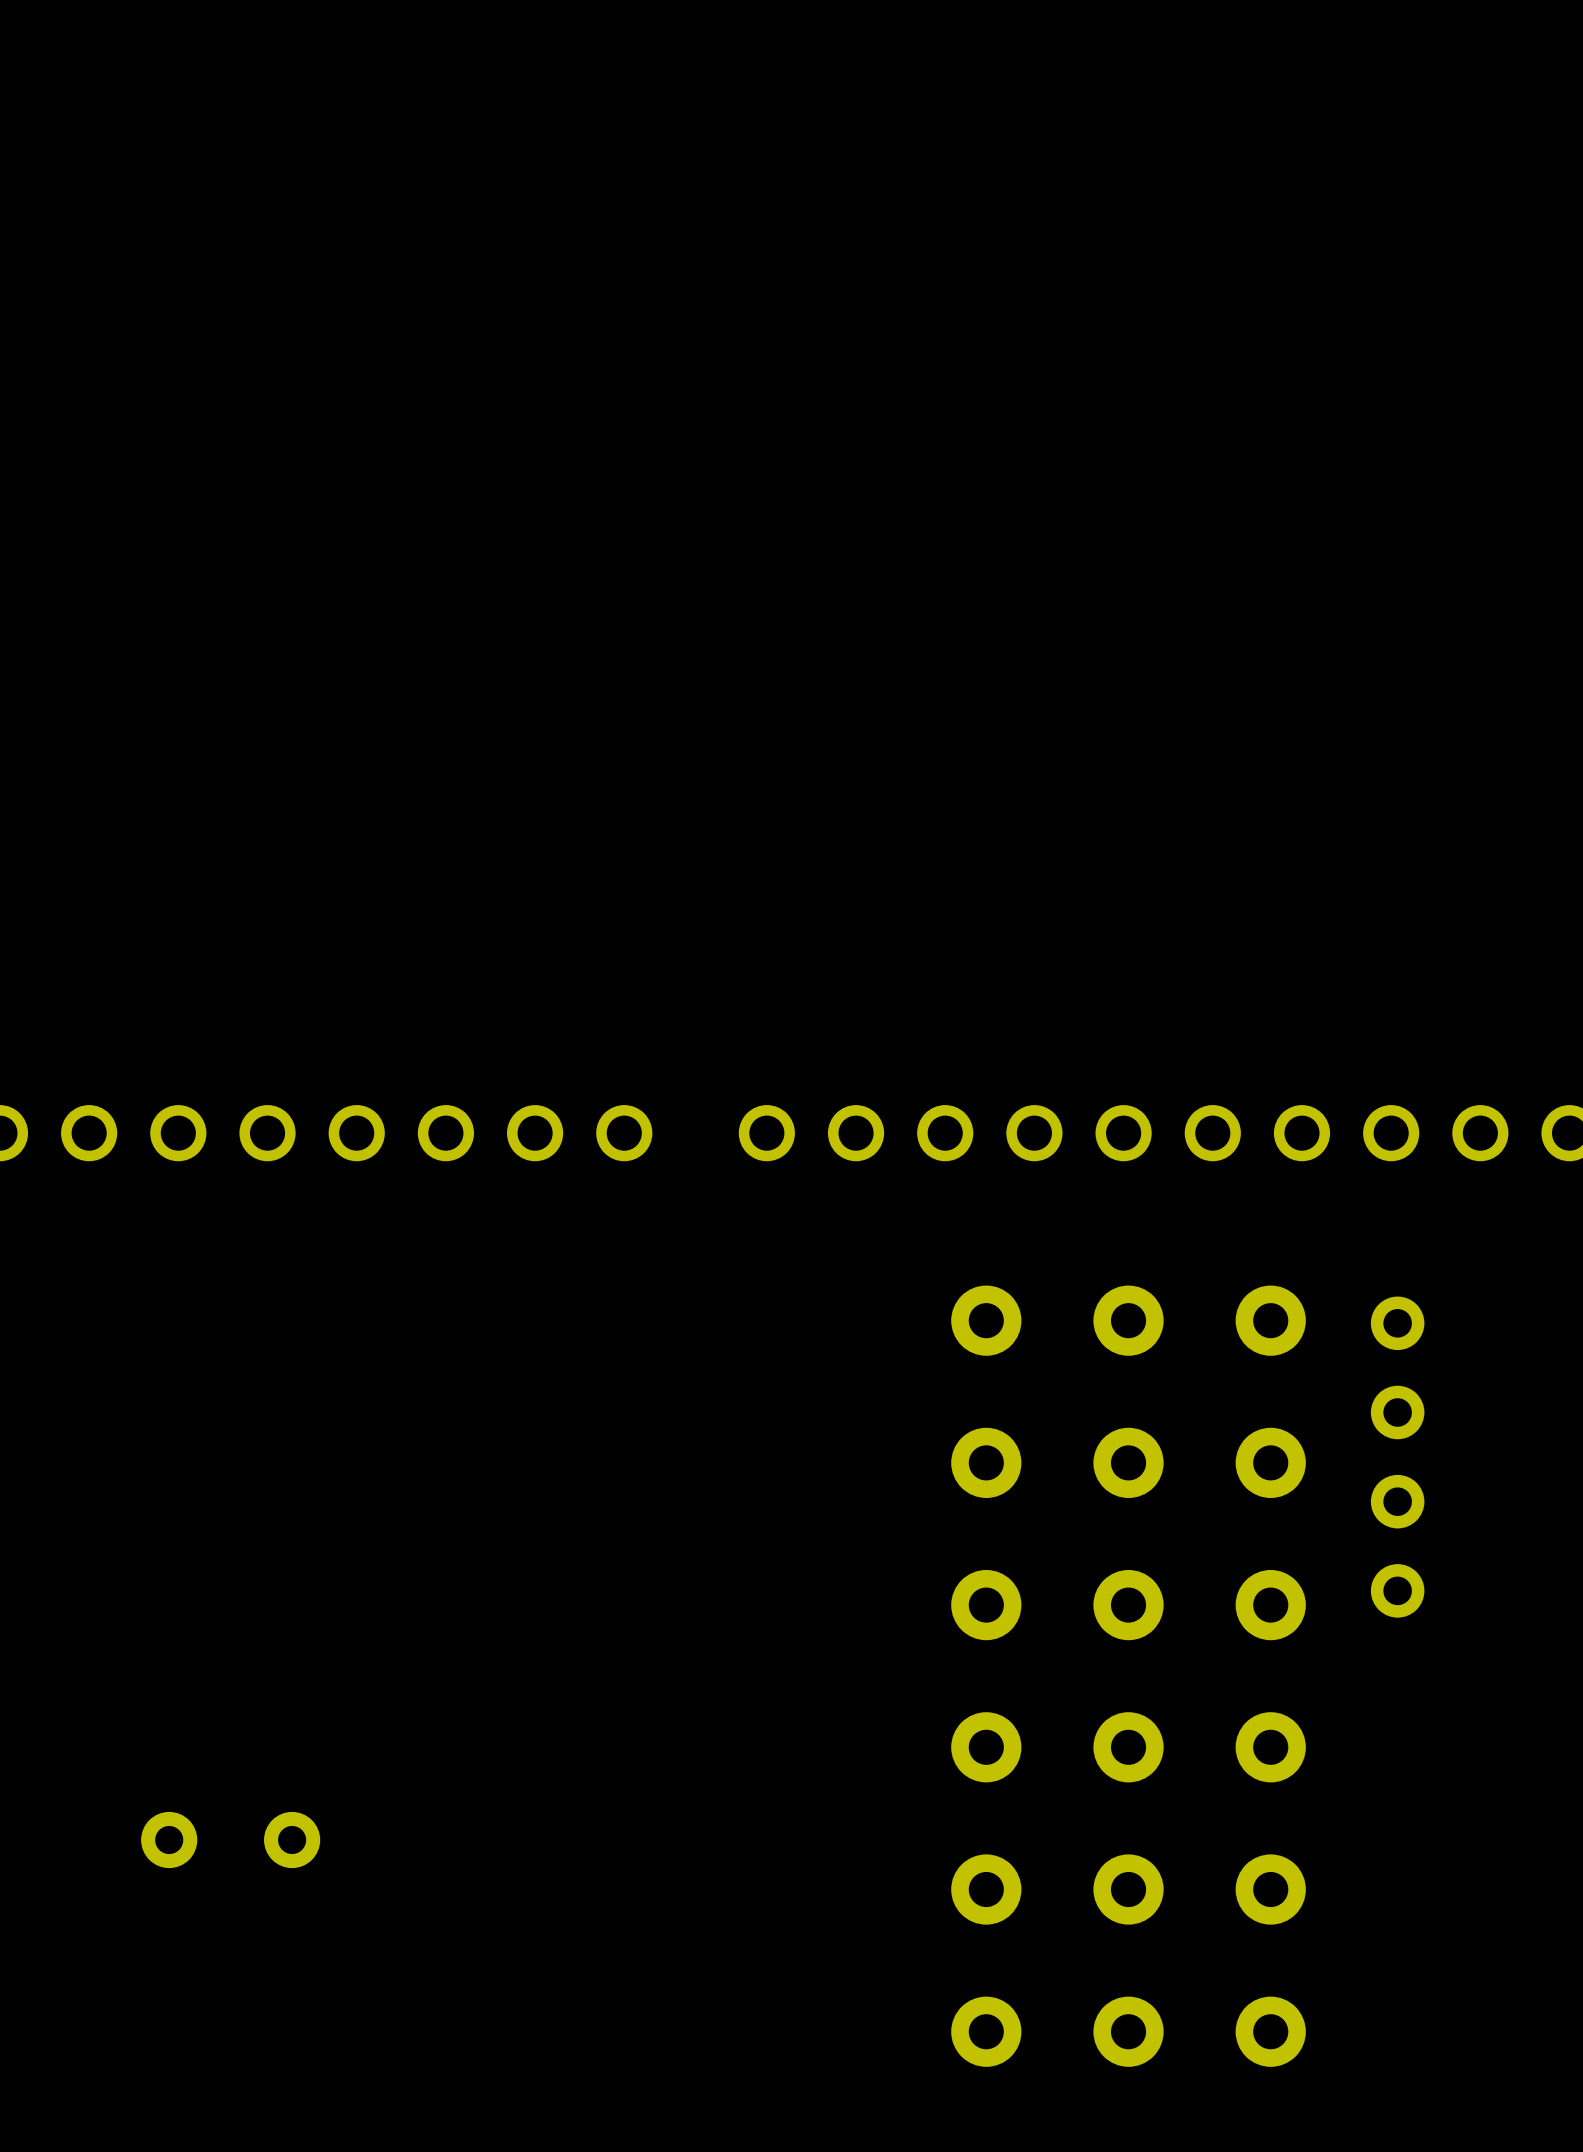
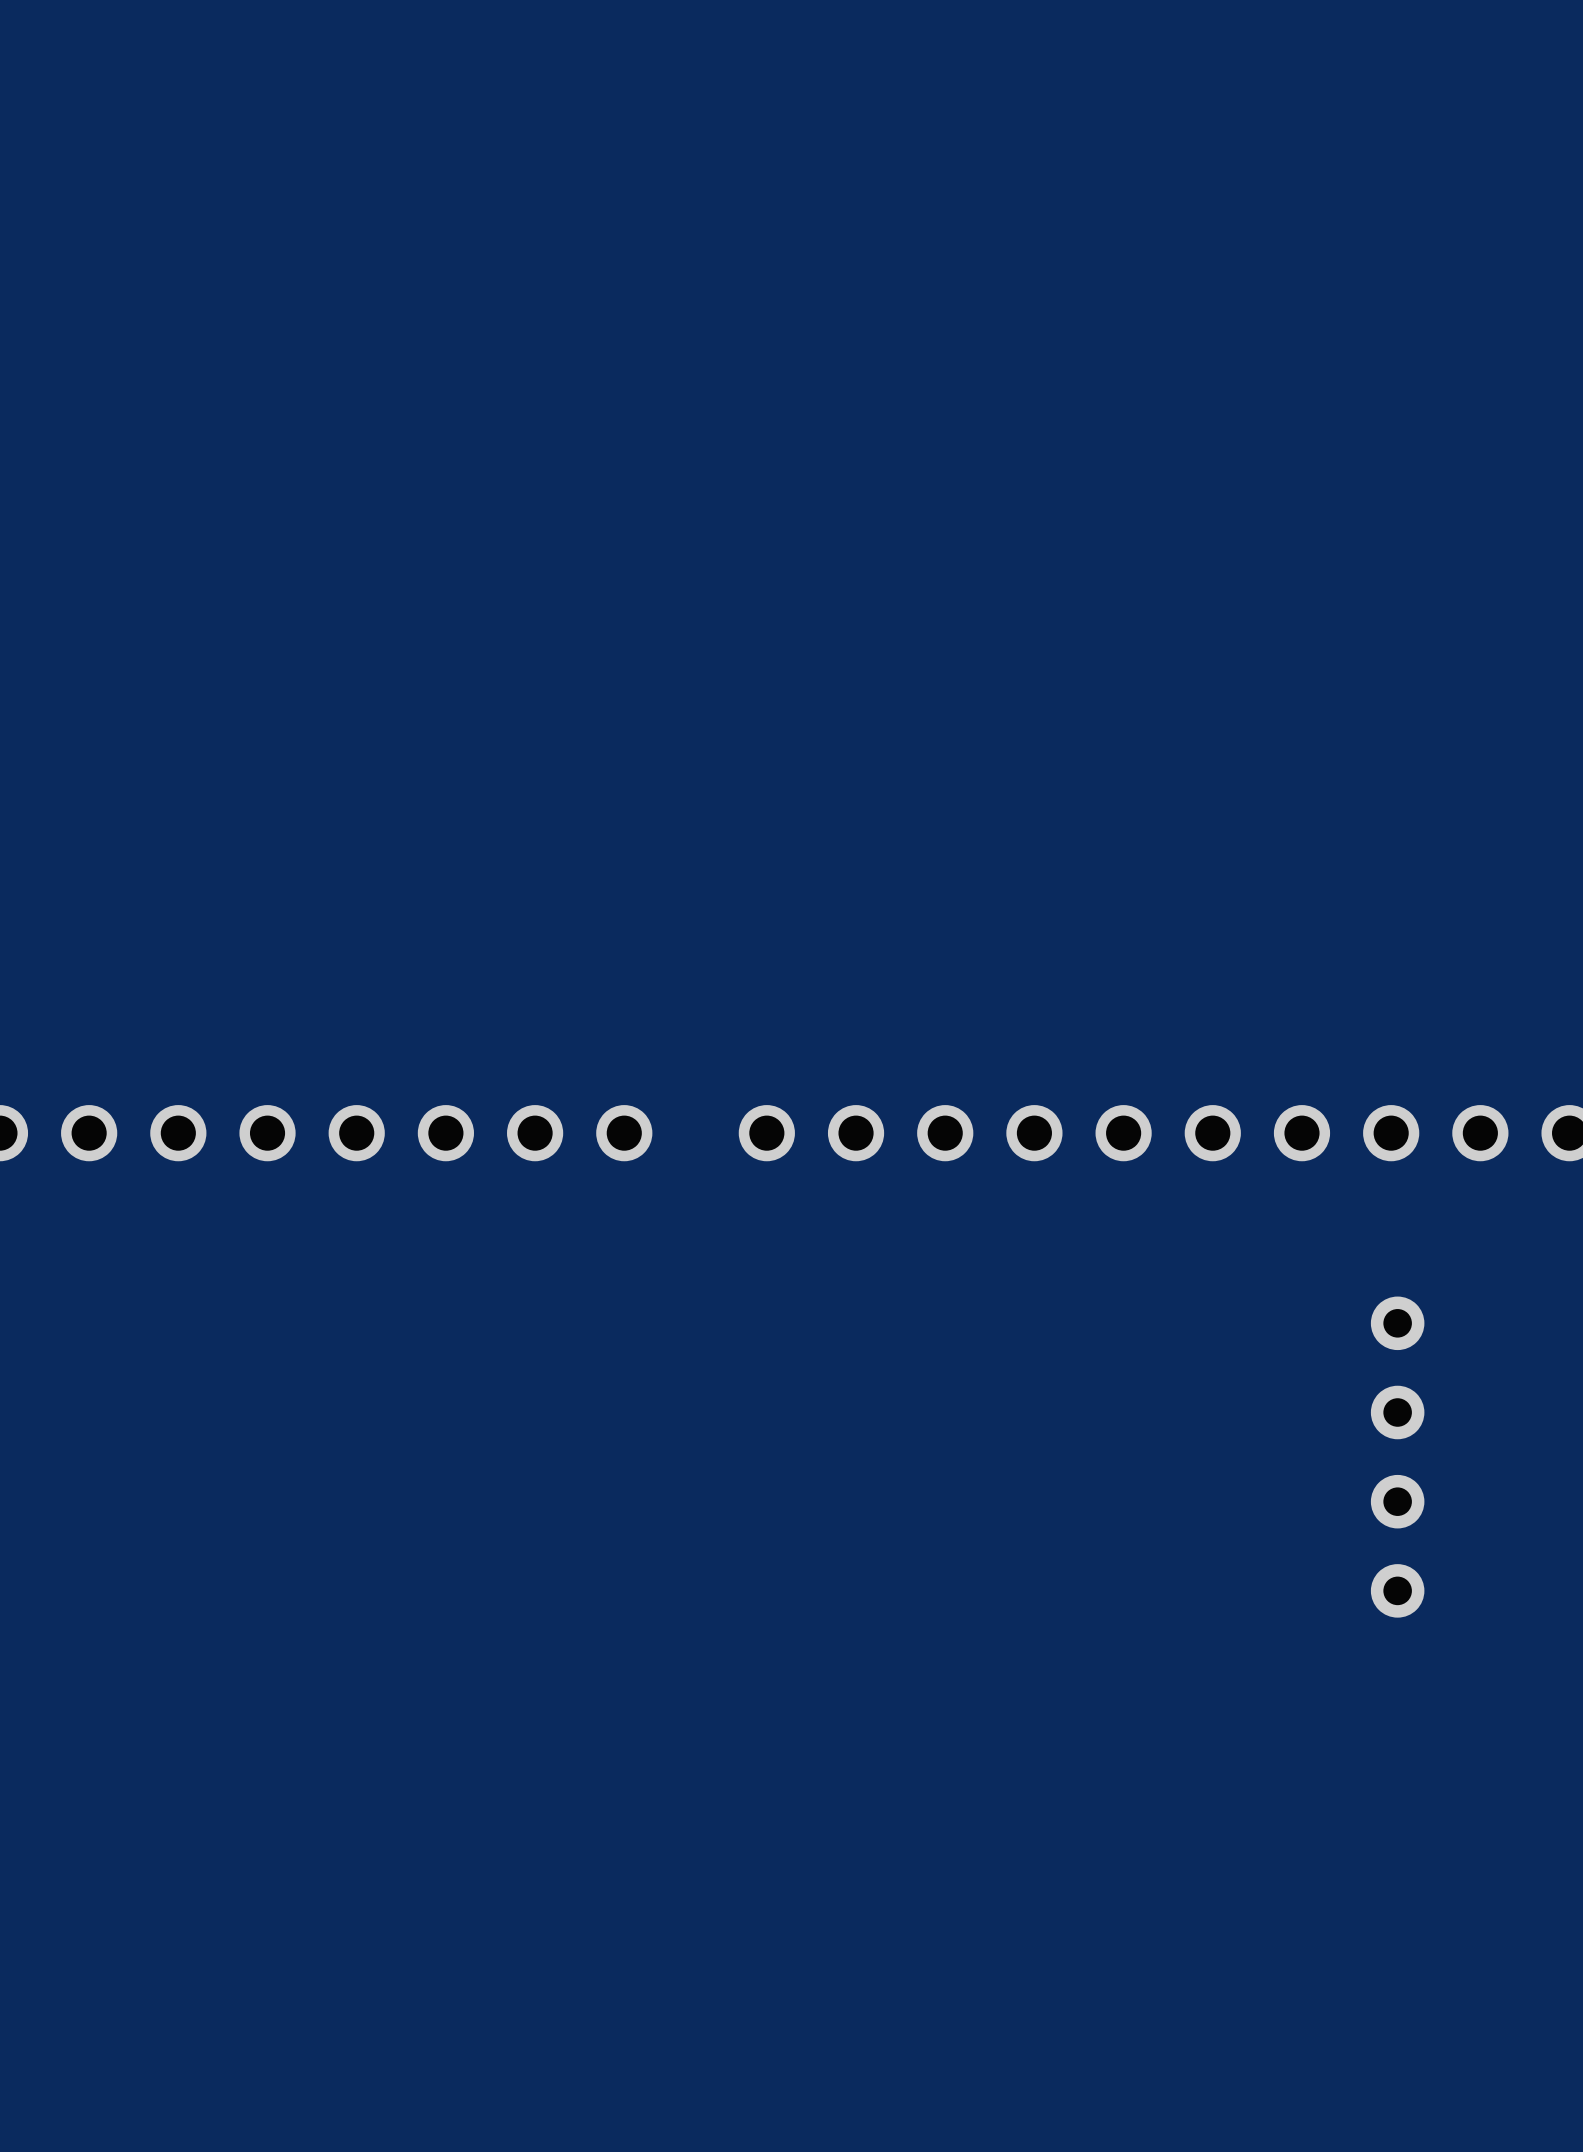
part: (986, 1320) -> none
part: (1128, 1320) -> none
part: (1270, 1320) -> none
part: (986, 1462) -> none
part: (1128, 1462) -> none
part: (1270, 1462) -> none
part: (986, 1605) -> none
part: (1128, 1605) -> none
part: (1270, 1605) -> none
part: (986, 1747) -> none
part: (1128, 1747) -> none
part: (1270, 1747) -> none
part: (230, 1840) -> none
part: (986, 1889) -> none
part: (1128, 1889) -> none
part: (1270, 1889) -> none
part: (986, 2031) -> none
part: (1128, 2031) -> none
part: (1270, 2031) -> none

